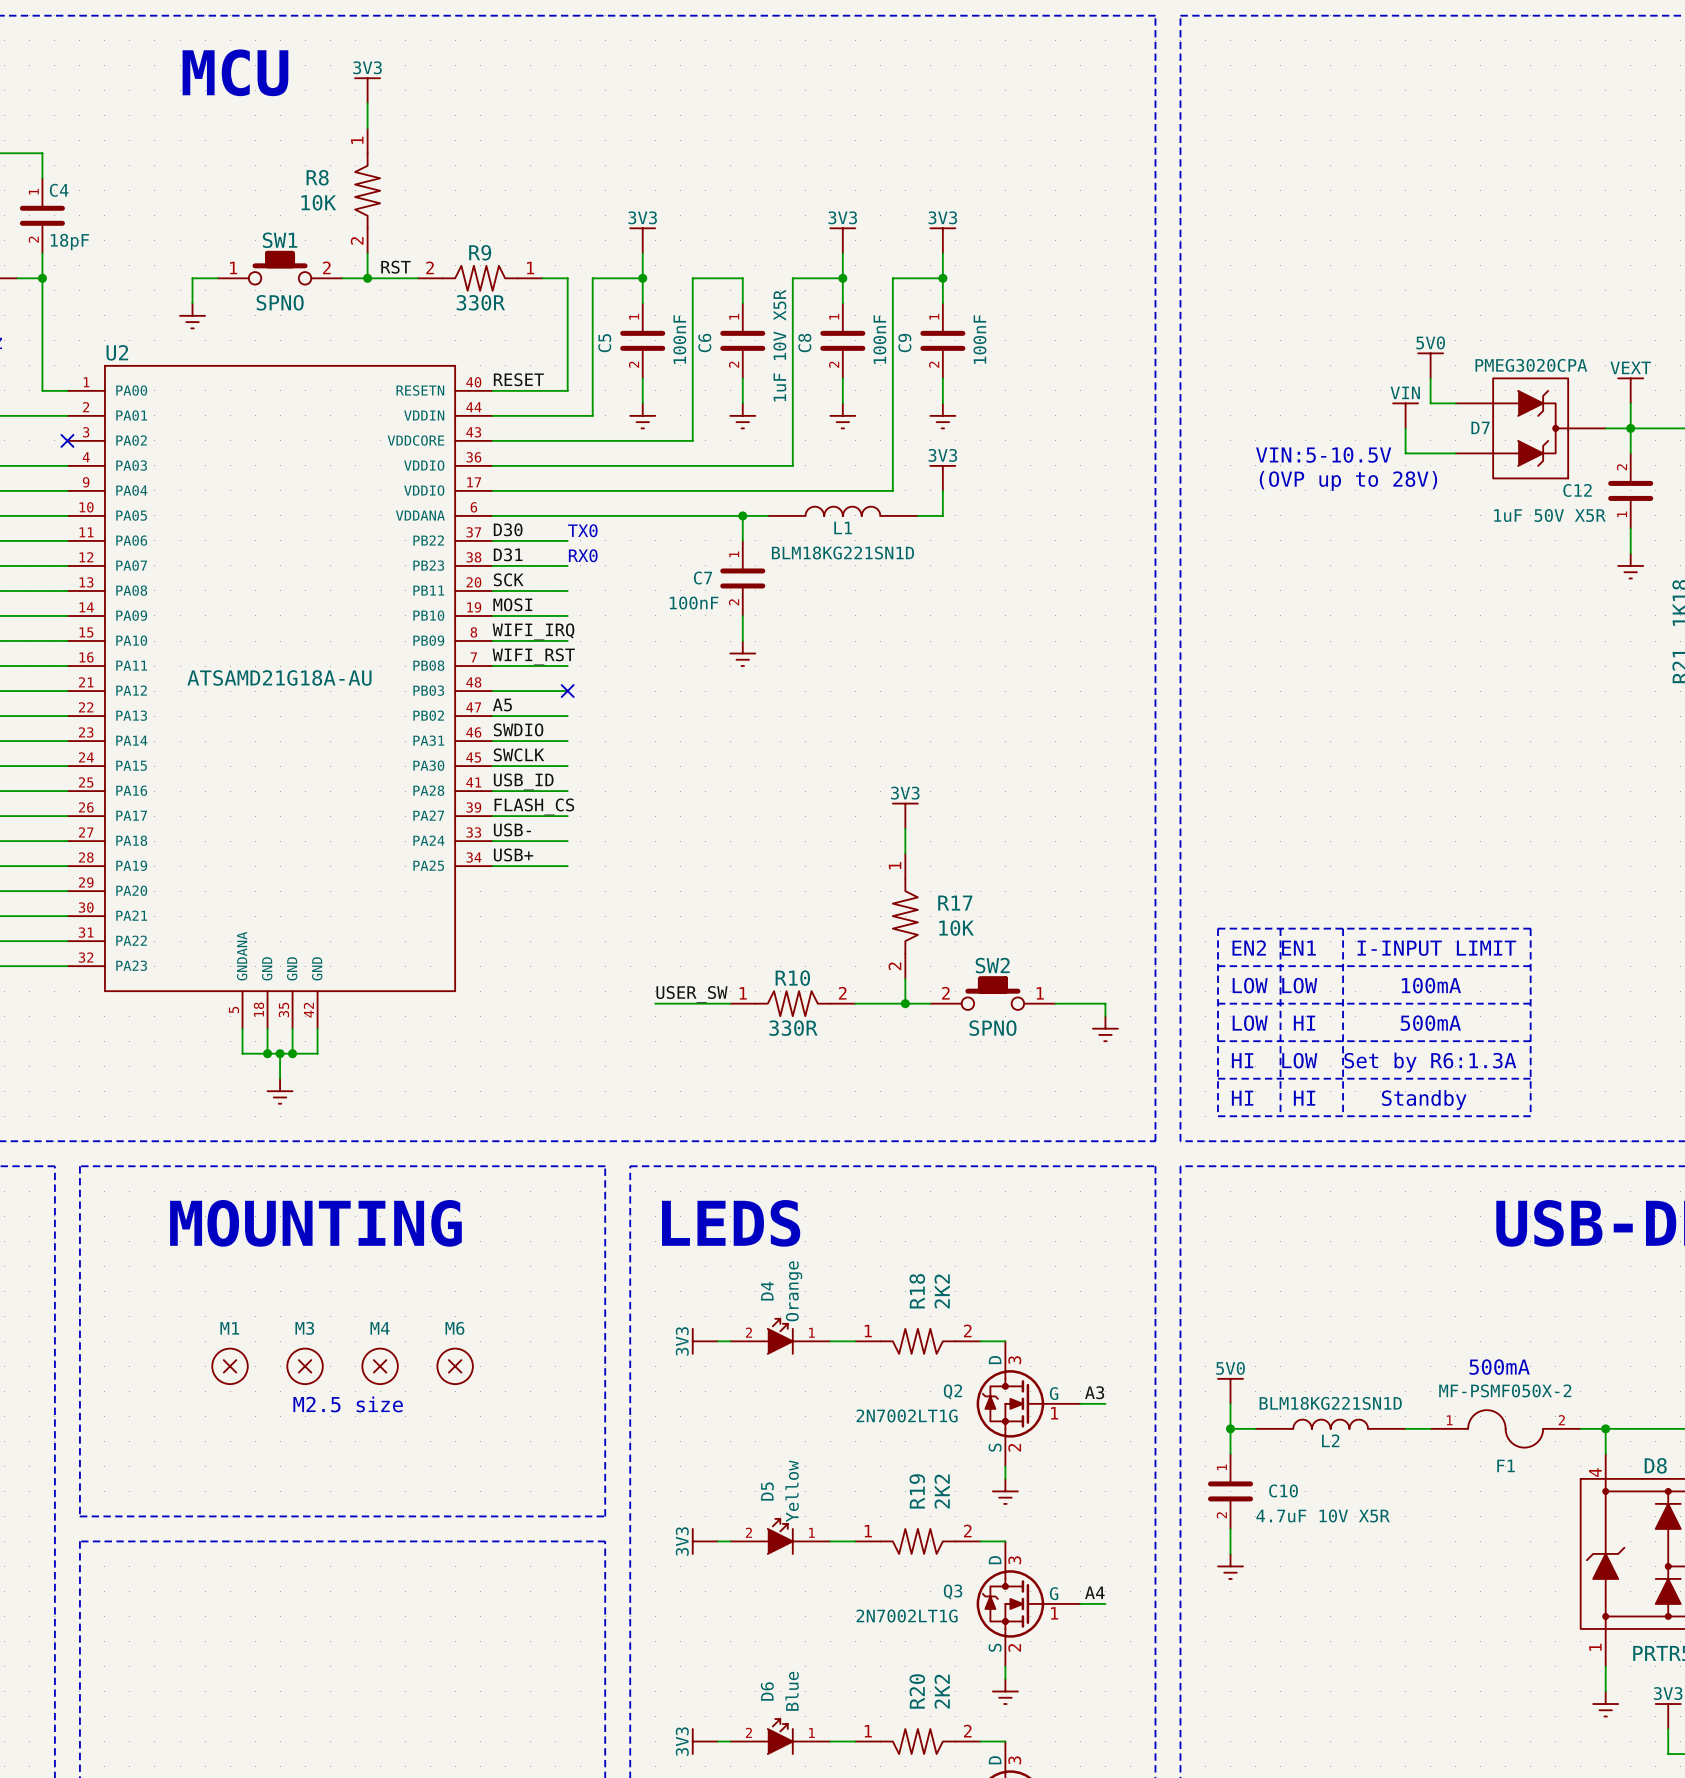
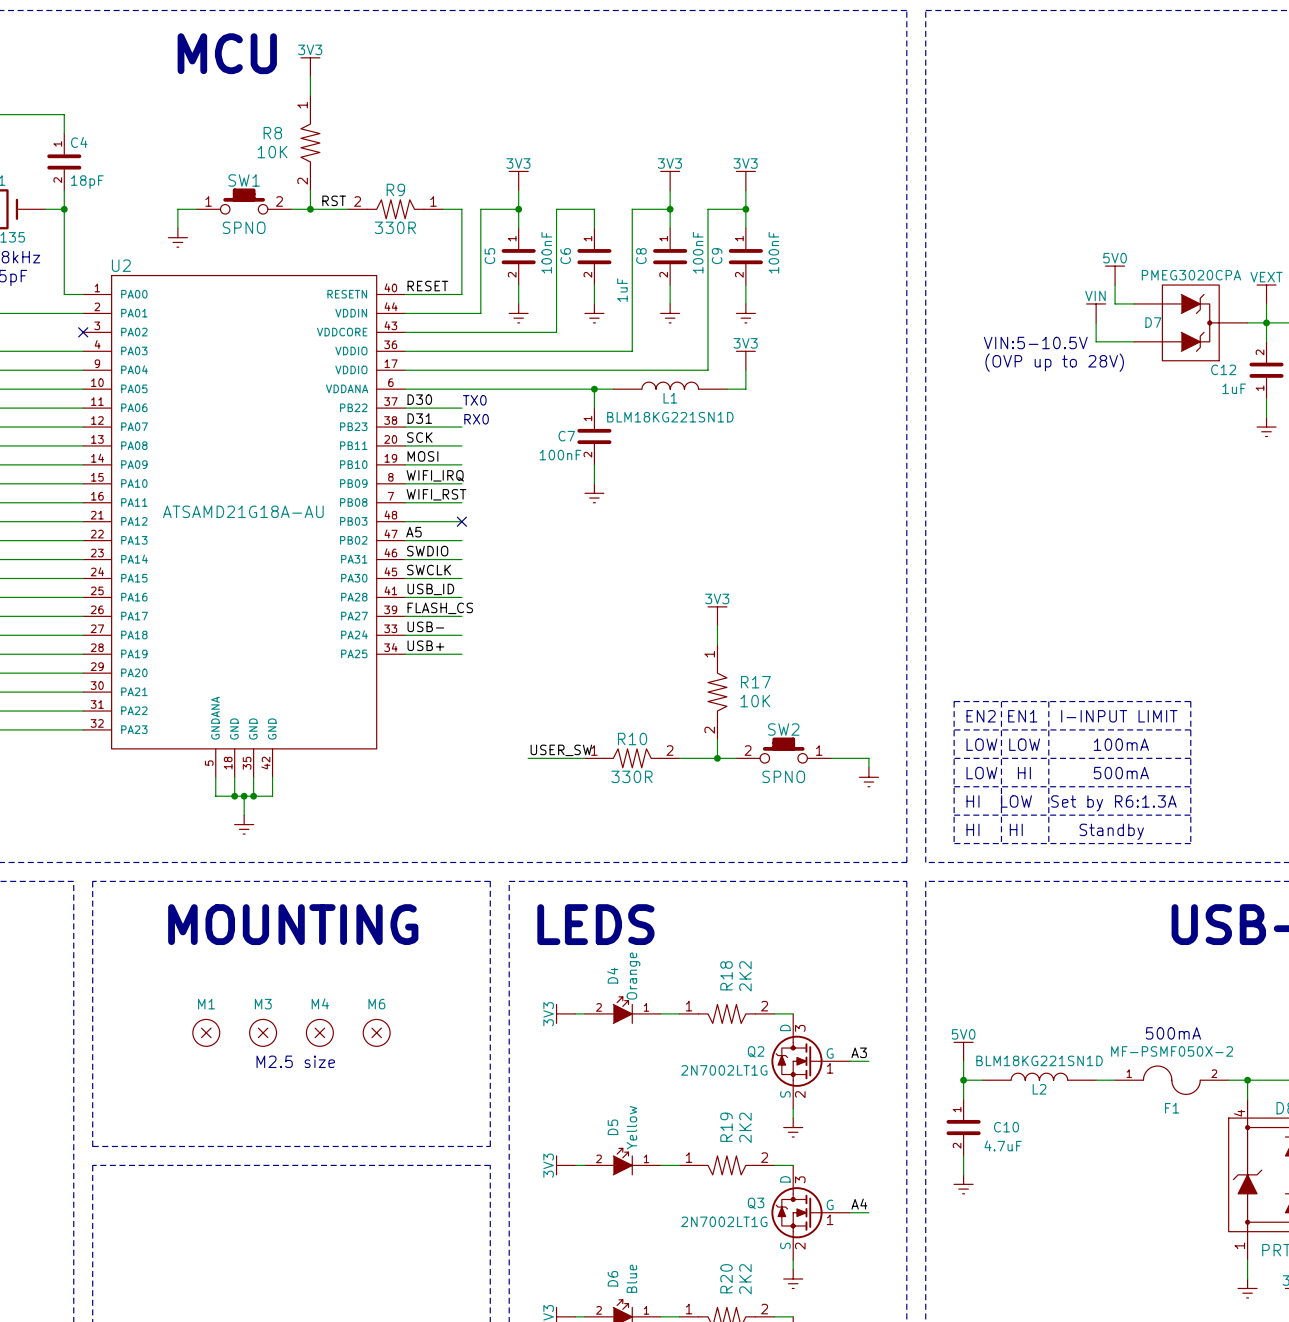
C6 value: 1uF 10V X5R (779, 345) -> 1uF (622, 290)
C12 value: 1uF 50V X5R (1549, 515) -> 1uF (1234, 388)
C10 value: 4.7uF 10V X5R (1323, 1515) -> 4.7uF (1003, 1145)

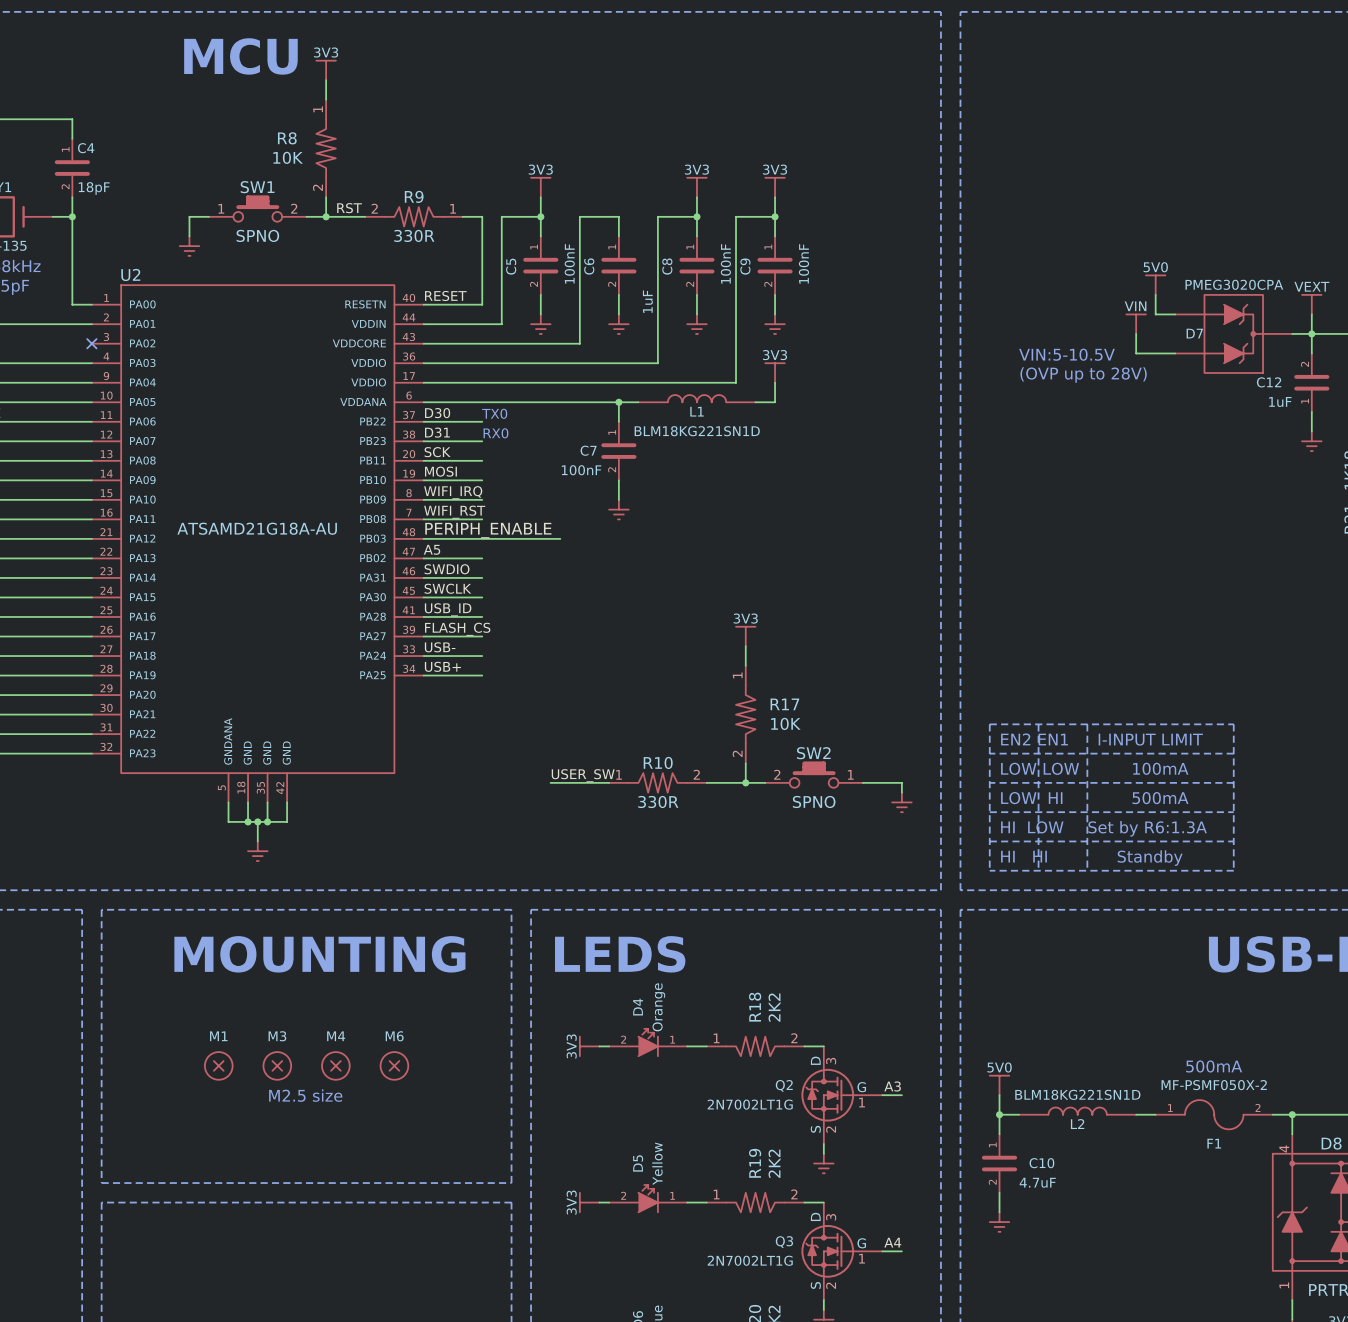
label: none -> PERIPH_ENABLE (488, 530)
wire: none -> (482, 538) (560, 538)
no-connect mark: (461, 521) -> none

